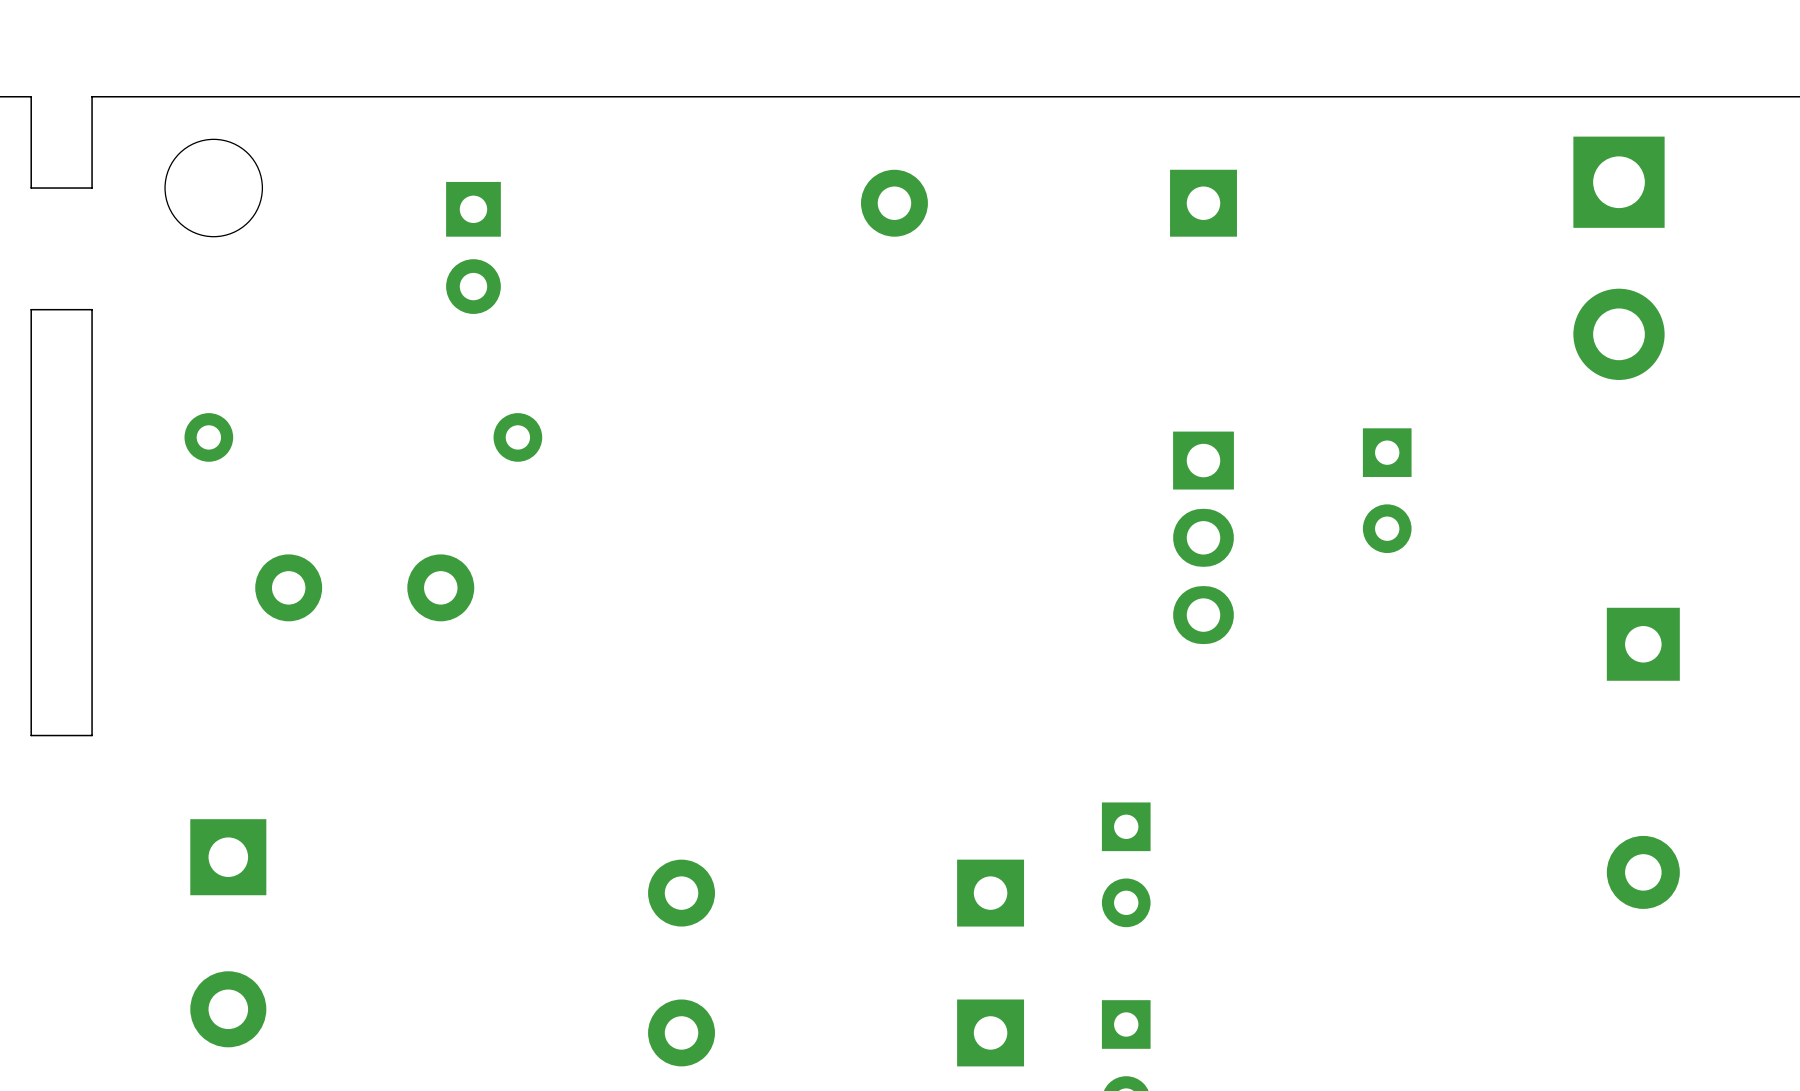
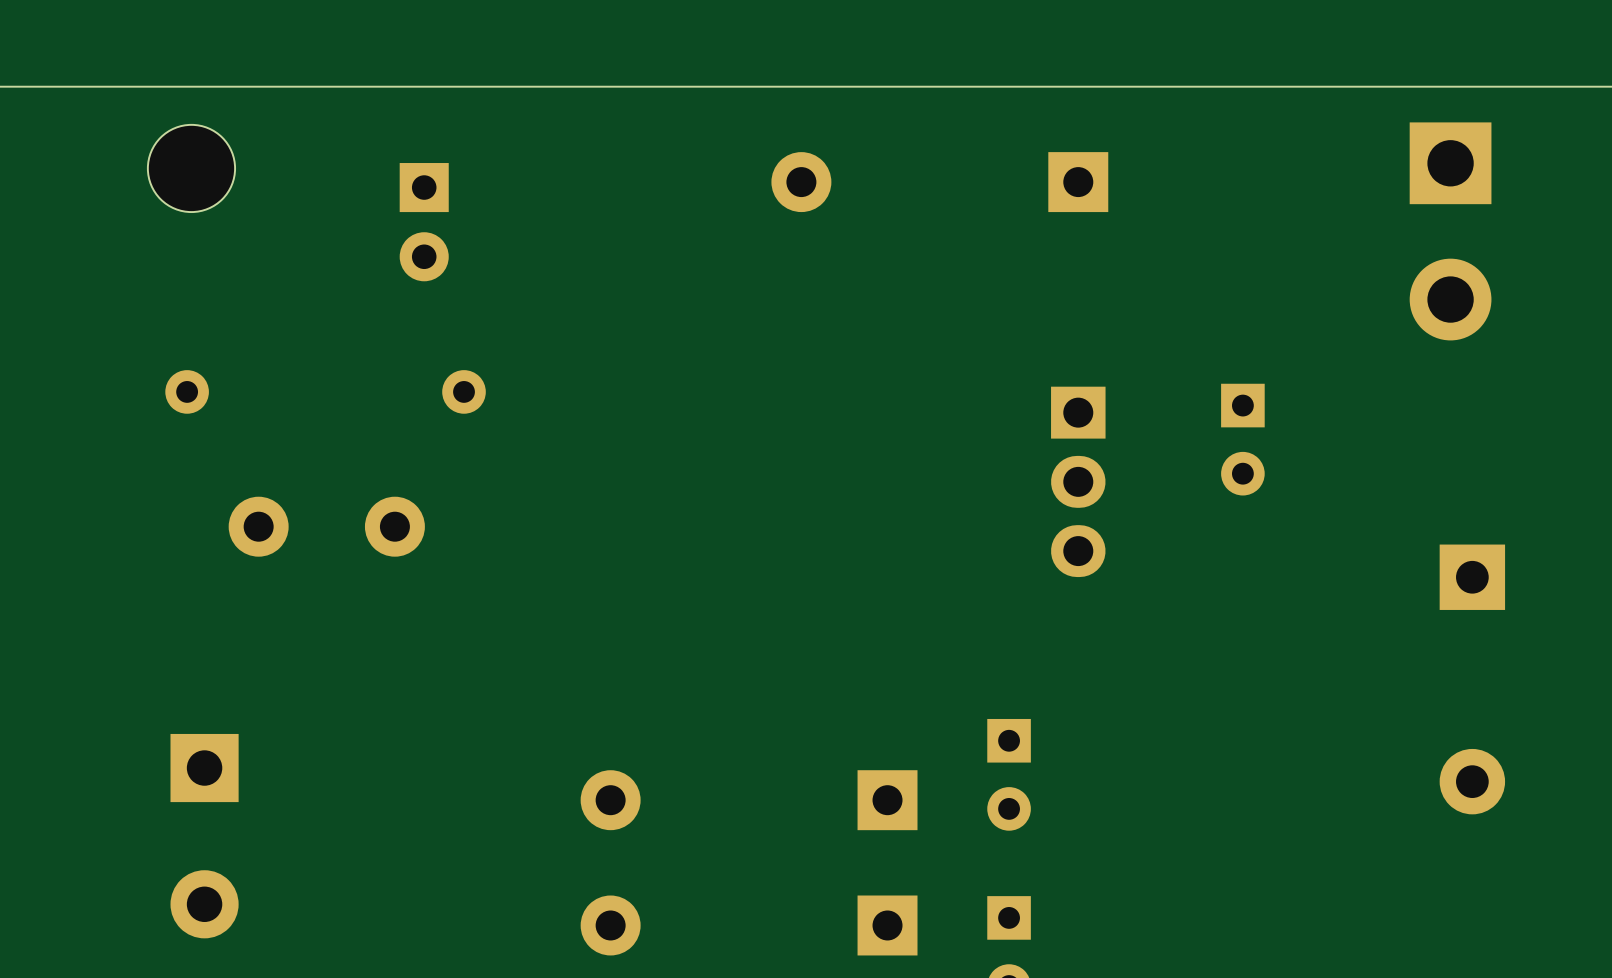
board edge: (92, 96) (92, 188) (31, 188) (31, 96) -> (82, 86) (27, 86)
board edge: (92, 309) (92, 735) (31, 735) (31, 309) (92, 309) -> none

